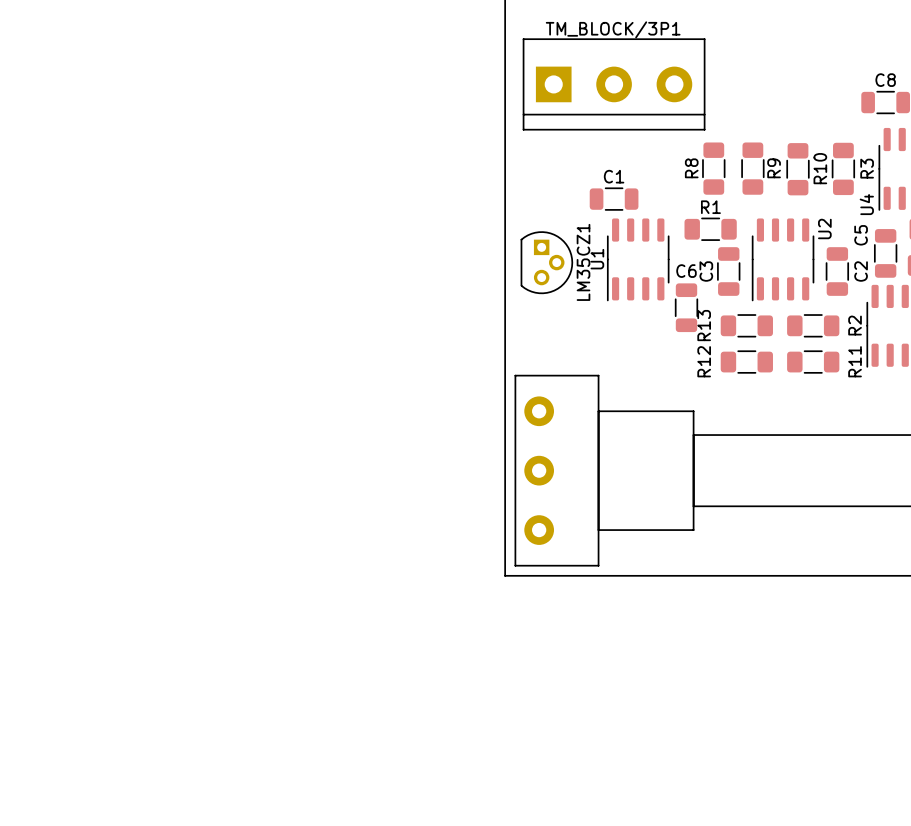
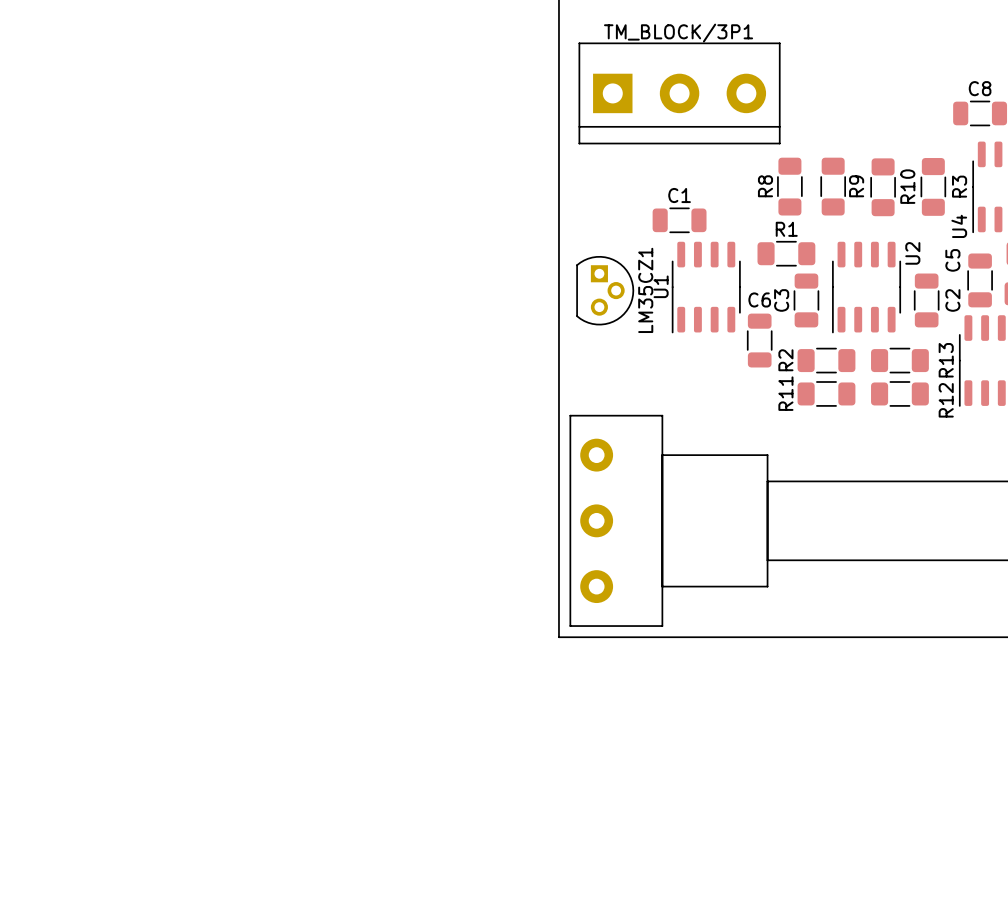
R13 name: R13 (704, 325) -> R2 (785, 360)
R2 name: R2 (855, 325) -> R13 (946, 360)
R12 name position: R12 (704, 361) -> R12 (946, 400)
R11 name position: R11 (855, 361) -> R11 (785, 393)
R12 position: (746, 362) -> (899, 393)
R11 position: (813, 362) -> (826, 393)

